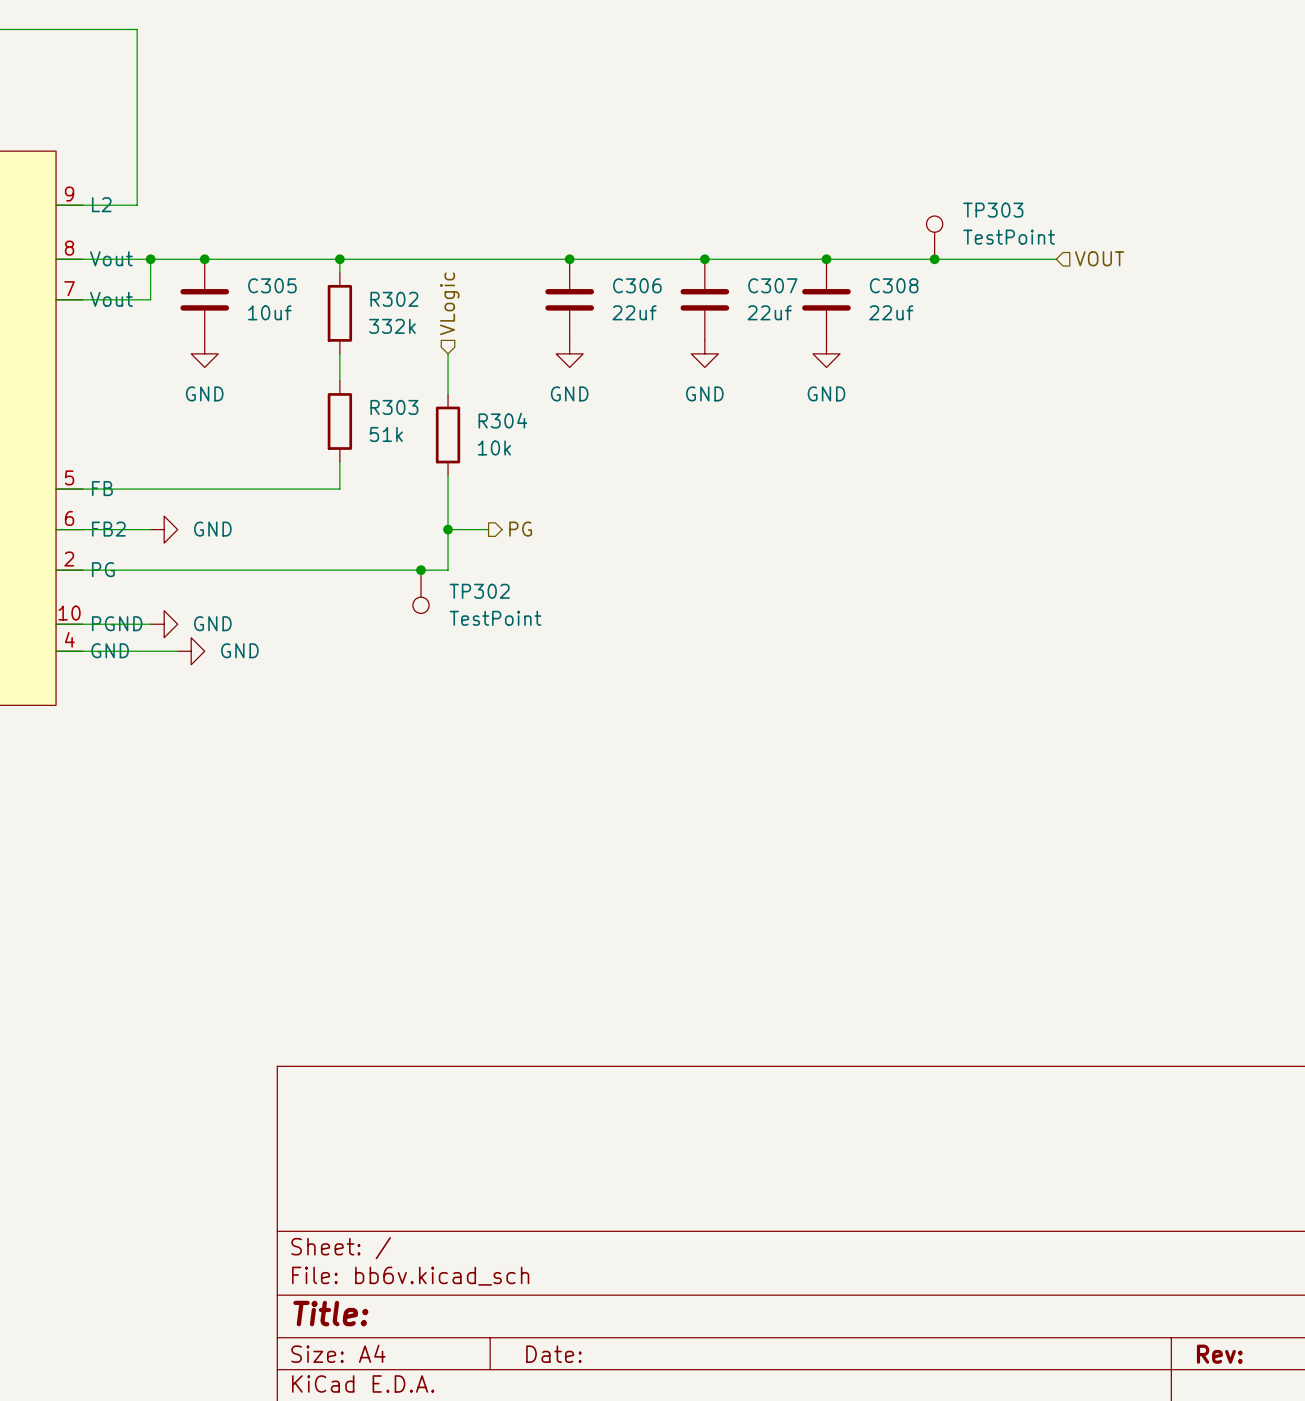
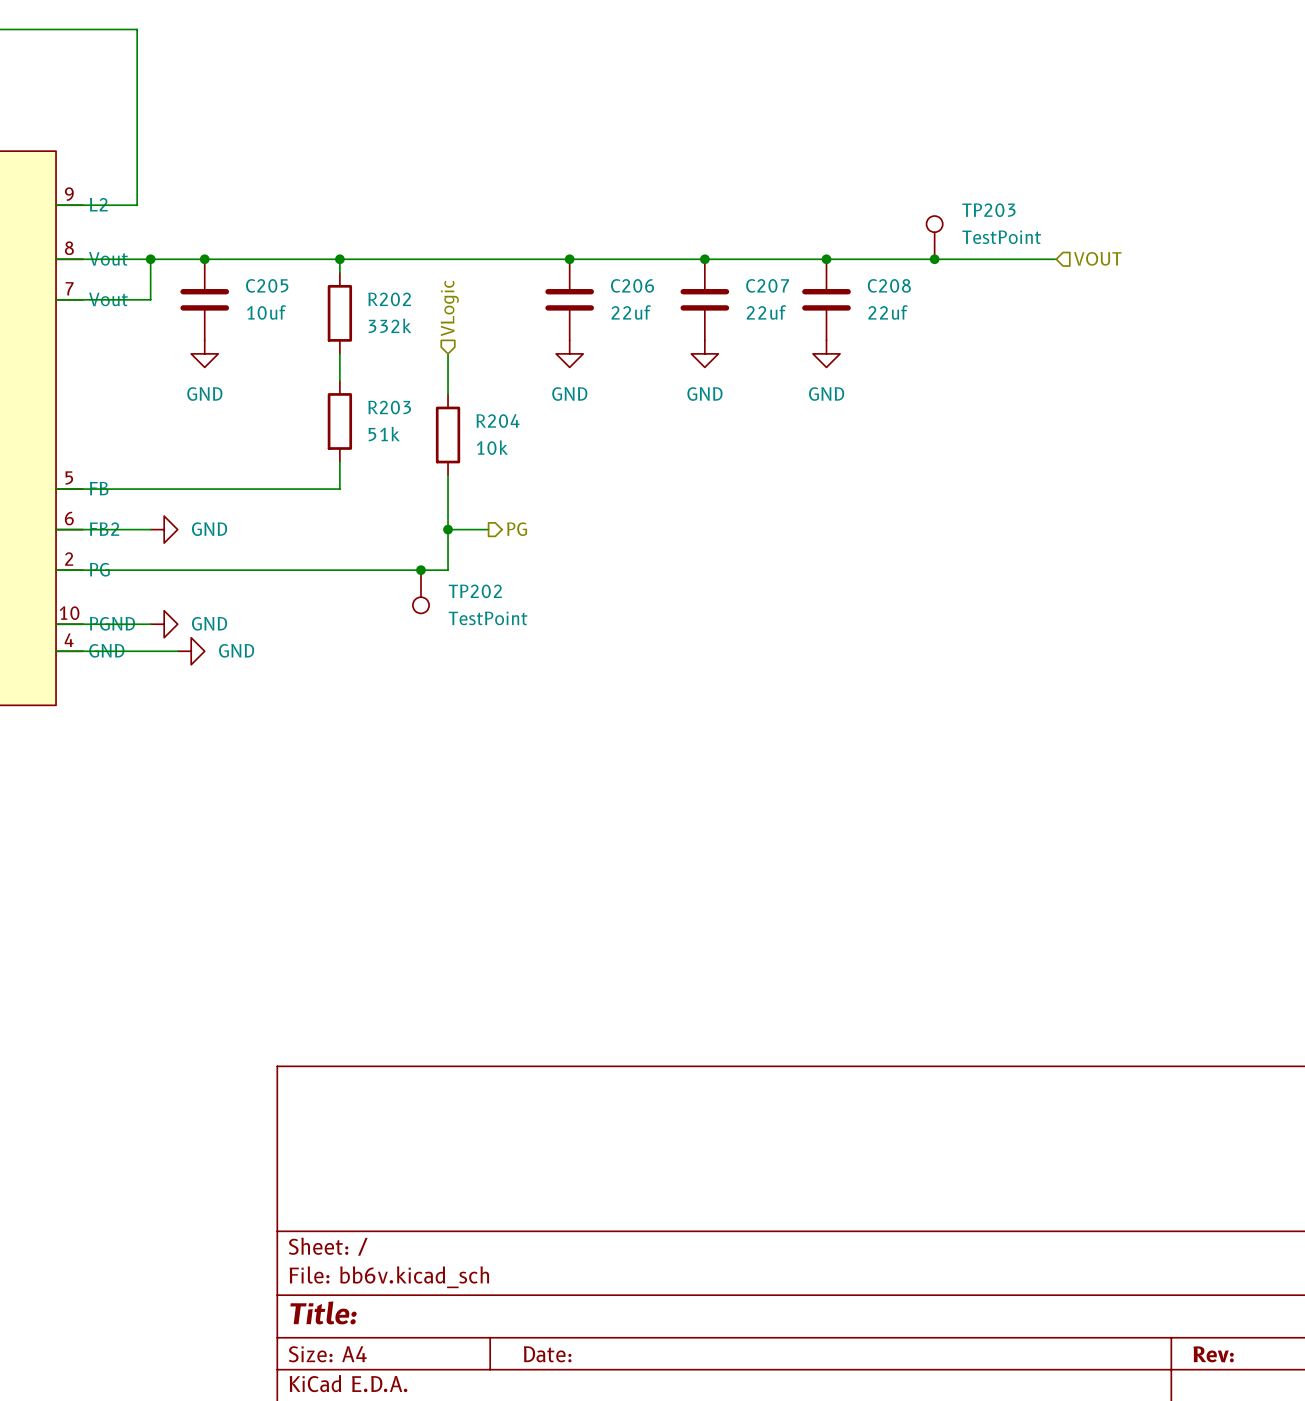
TP303 name: TP303 (993, 210) -> TP203 (988, 210)
C305 name: C305 (272, 285) -> C205 (267, 285)
C306 name: C306 (637, 285) -> C206 (632, 285)
C307 name: C307 (772, 285) -> C207 (767, 285)
C308 name: C308 (894, 285) -> C208 (889, 285)
R302 name: R302 (394, 299) -> R202 (389, 299)
R303 name: R303 (394, 407) -> R203 (389, 407)
R304 name: R304 (502, 420) -> R204 (497, 421)
TP302 name: TP302 (479, 591) -> TP202 (475, 591)

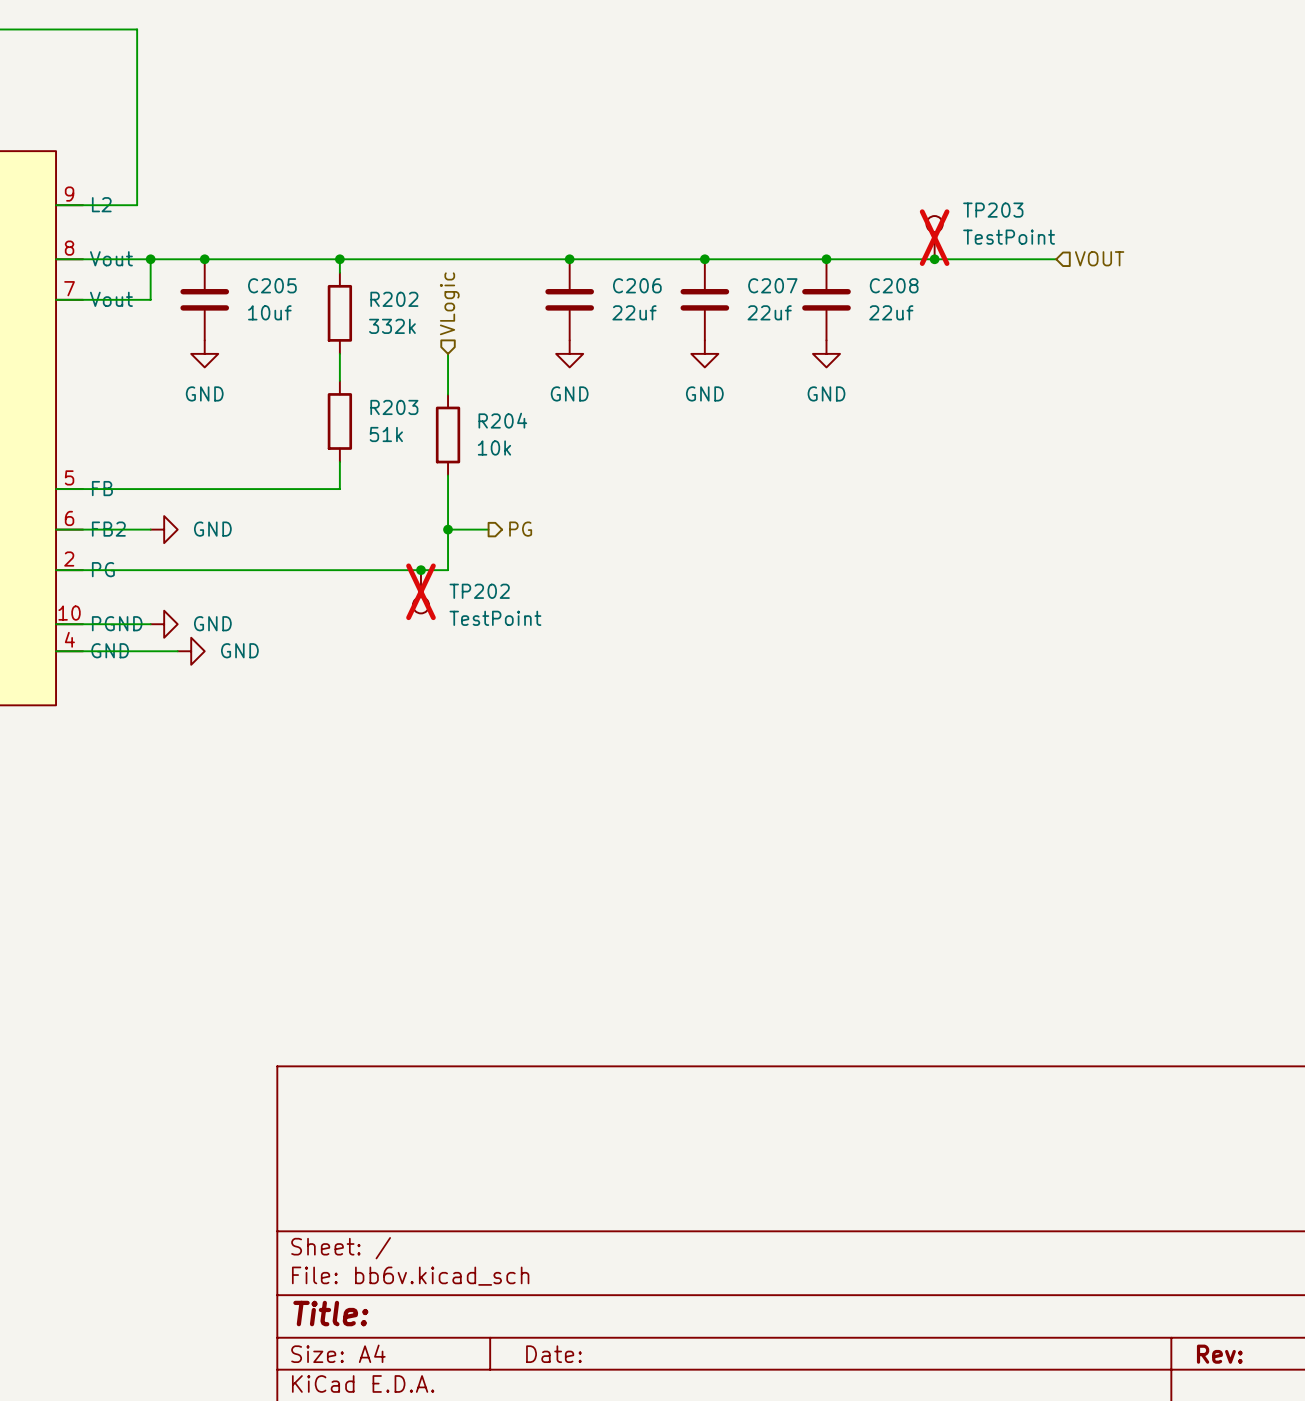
TP203 do-not-place cross: none -> (934, 237)
TP202 do-not-place cross: none -> (420, 591)

